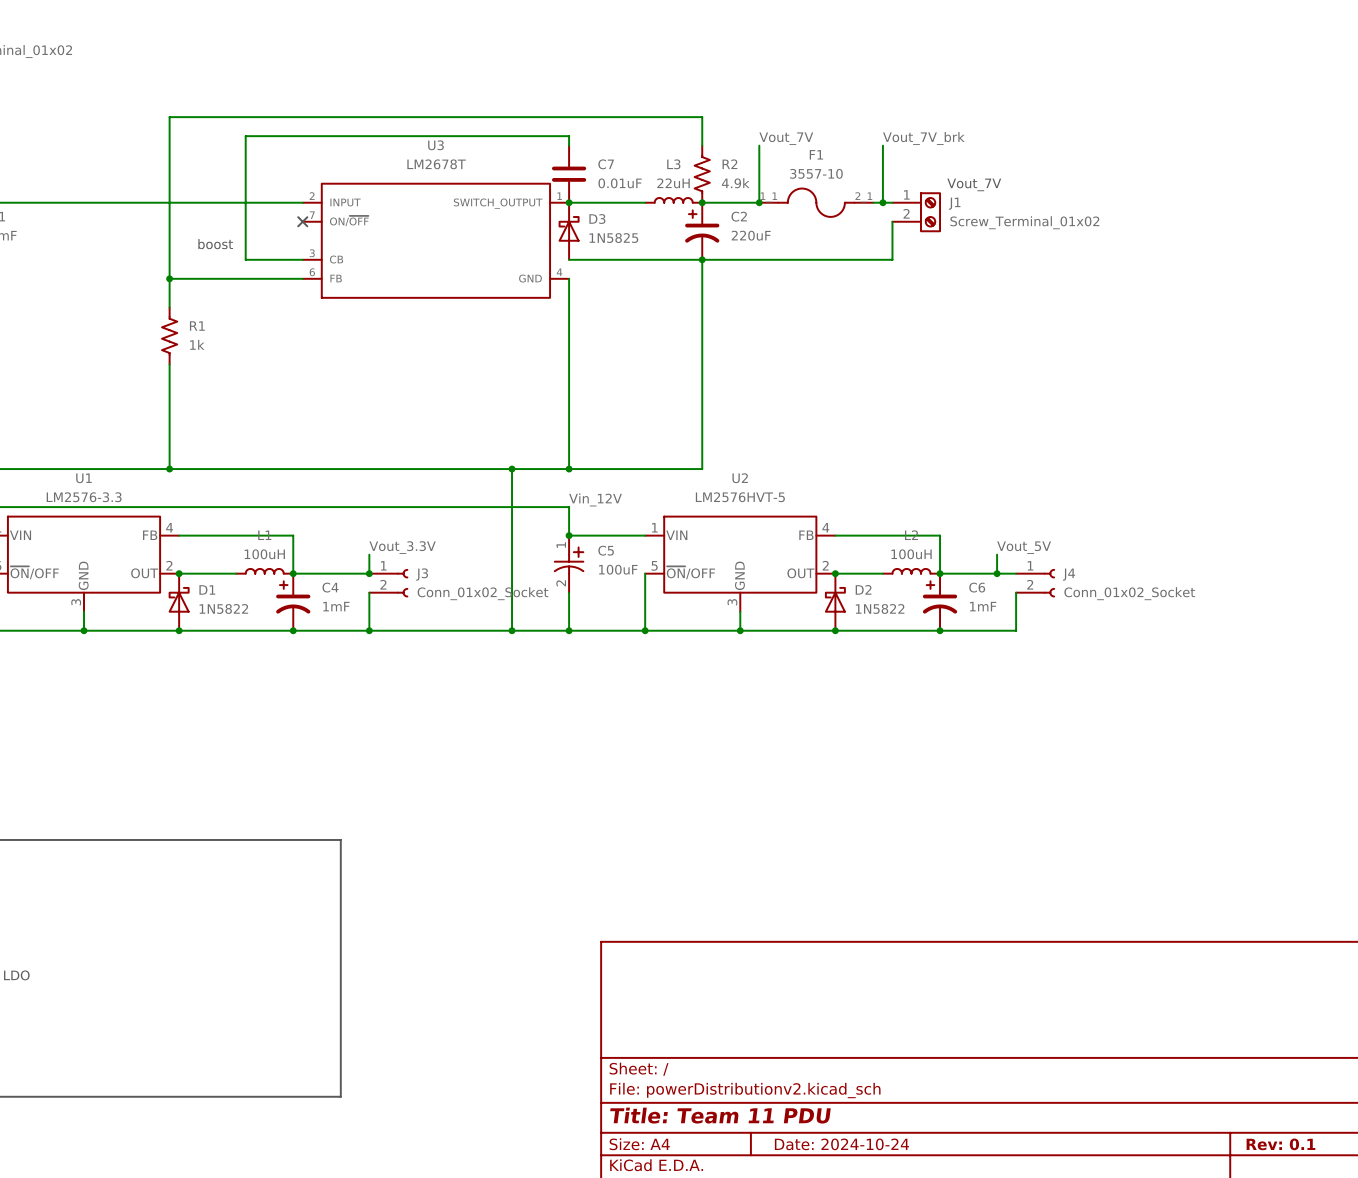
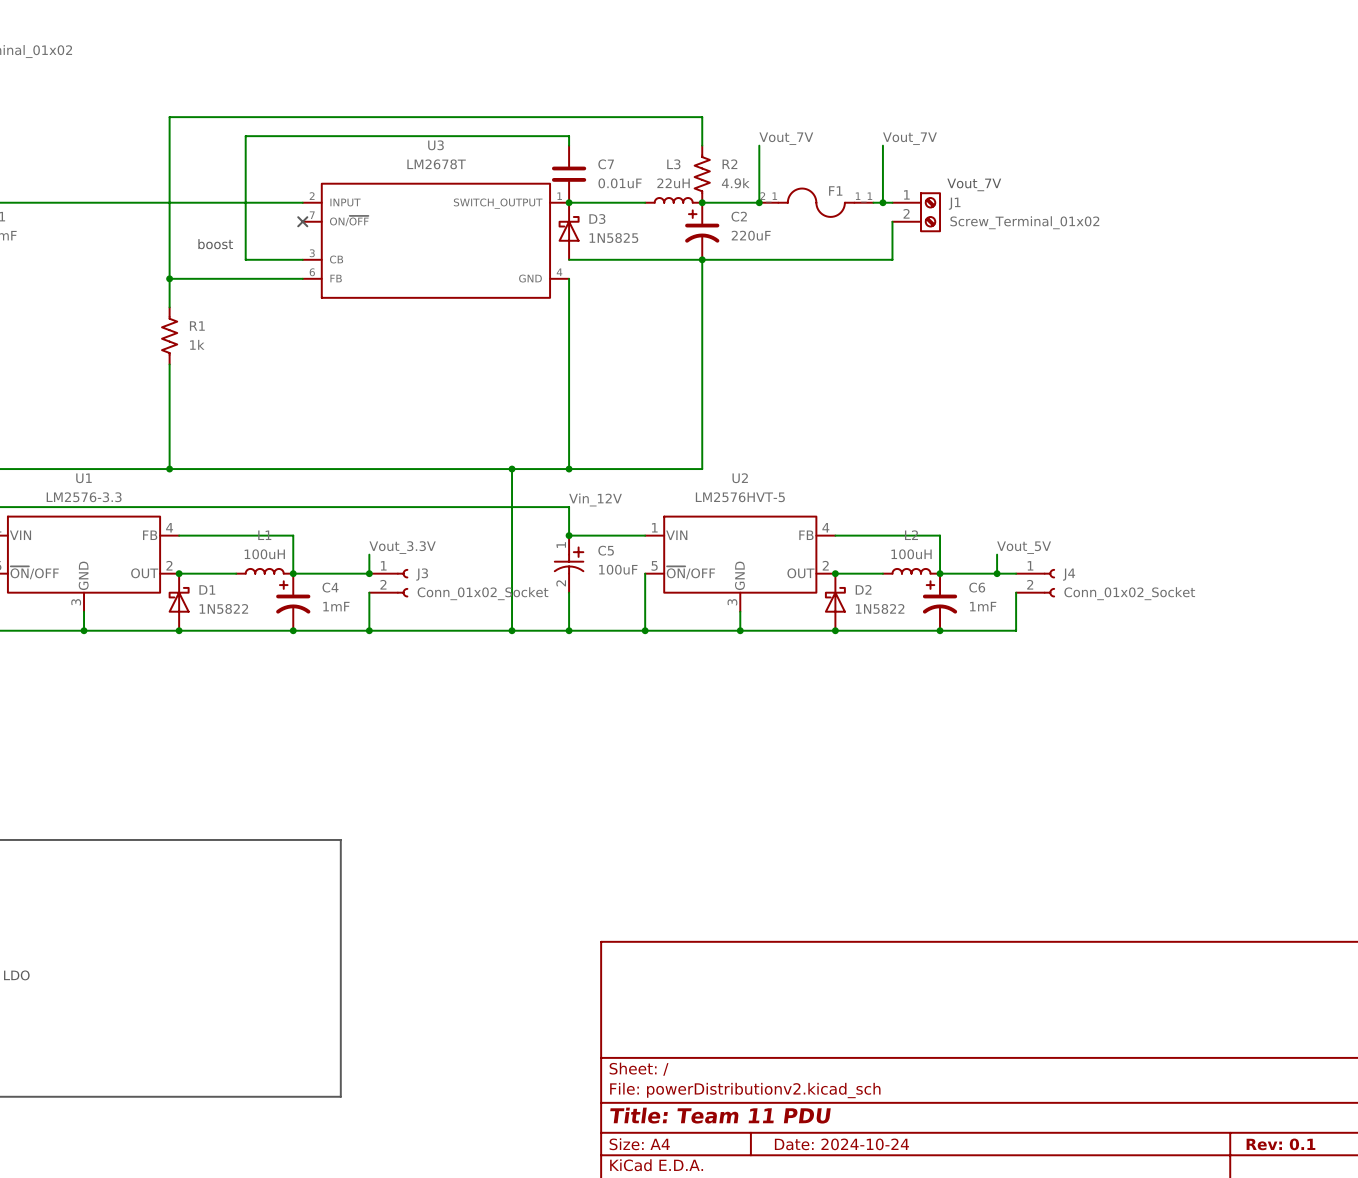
label: Vout_7V_brk (923, 138) -> Vout_7V (909, 138)
F1 name position: F1 (816, 154) -> F1 (835, 190)
F1 value: 3557-10 (816, 173) -> none
F1 rotation: 0° (816, 202) -> 180° (816, 202)

